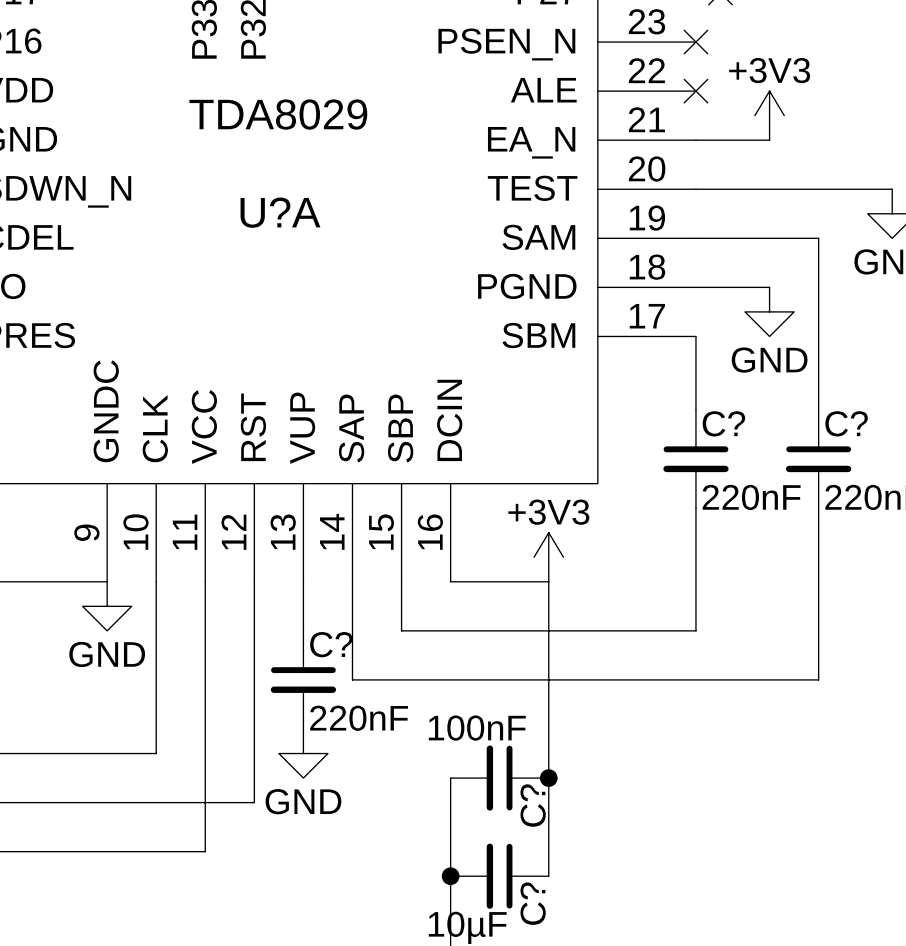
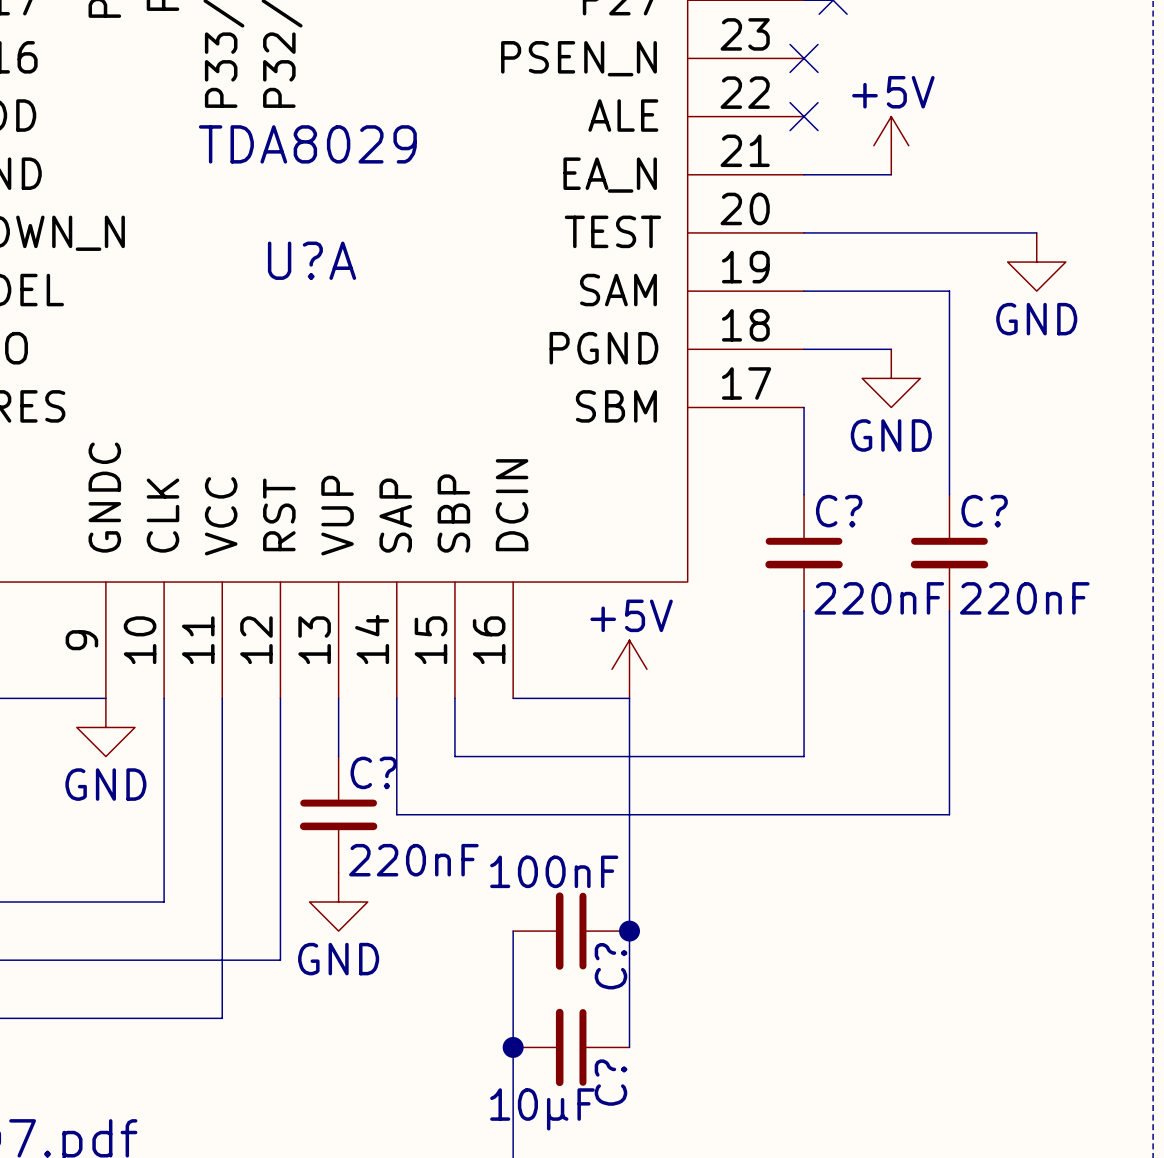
power symbol: +3V3 (769, 115) -> +5V (891, 145)
power symbol: +3V3 (548, 557) -> +5V (629, 669)

